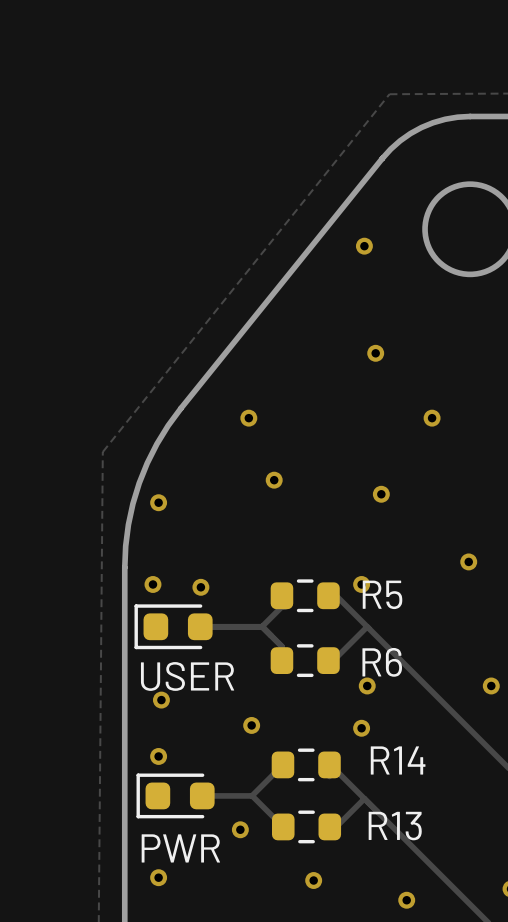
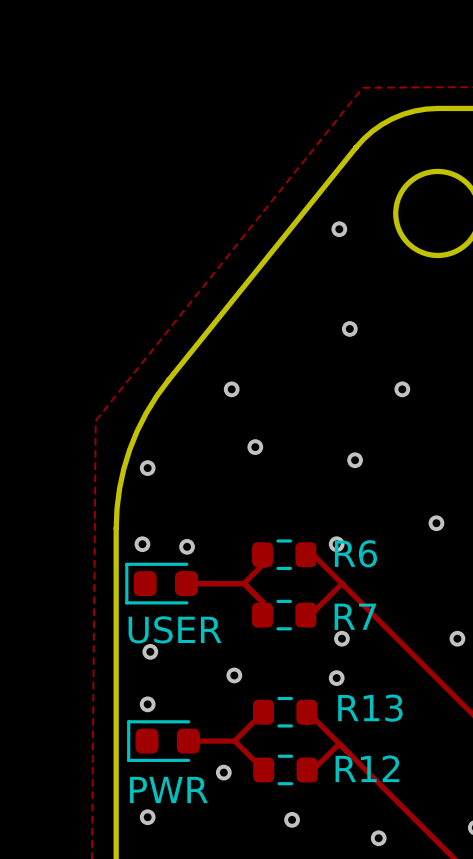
R5 name: R5 (382, 594) -> R6 (355, 553)
R6 name: R6 (382, 662) -> R7 (355, 616)
R14 name: R14 (398, 760) -> R13 (370, 708)
R13 name: R13 (395, 826) -> R12 (367, 768)

